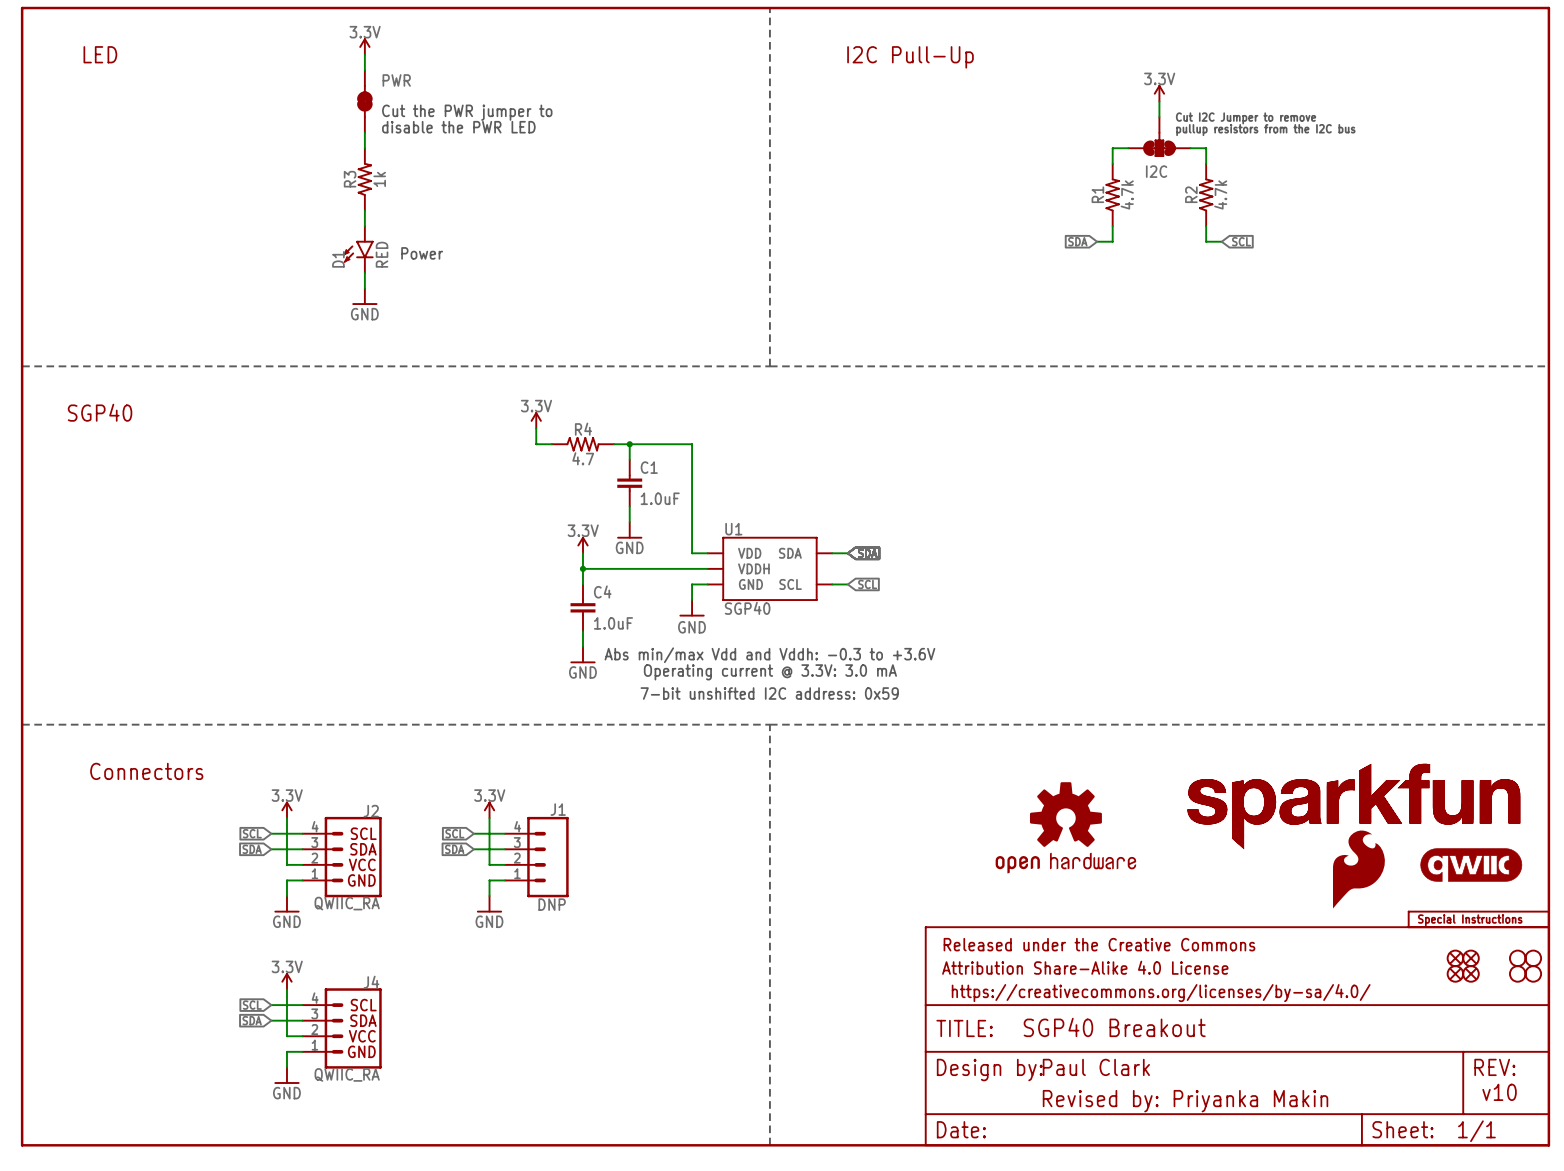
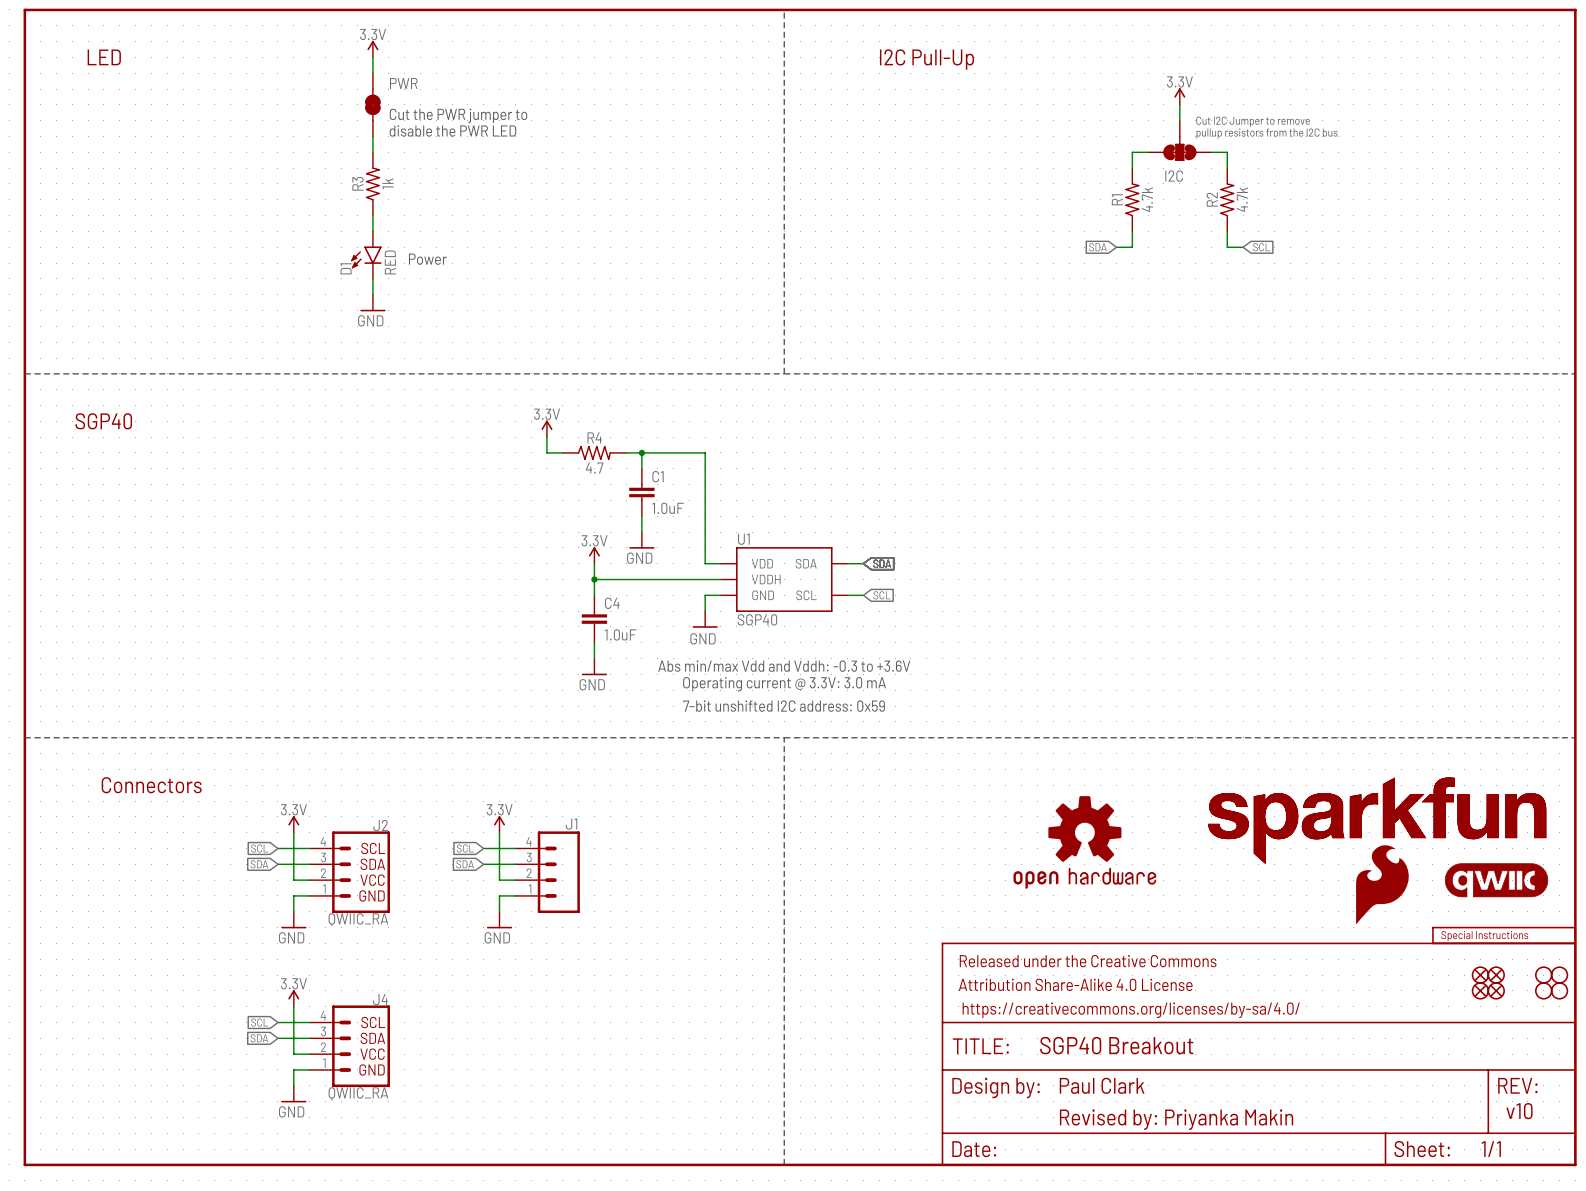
J1 value: DNP (552, 904) -> none

